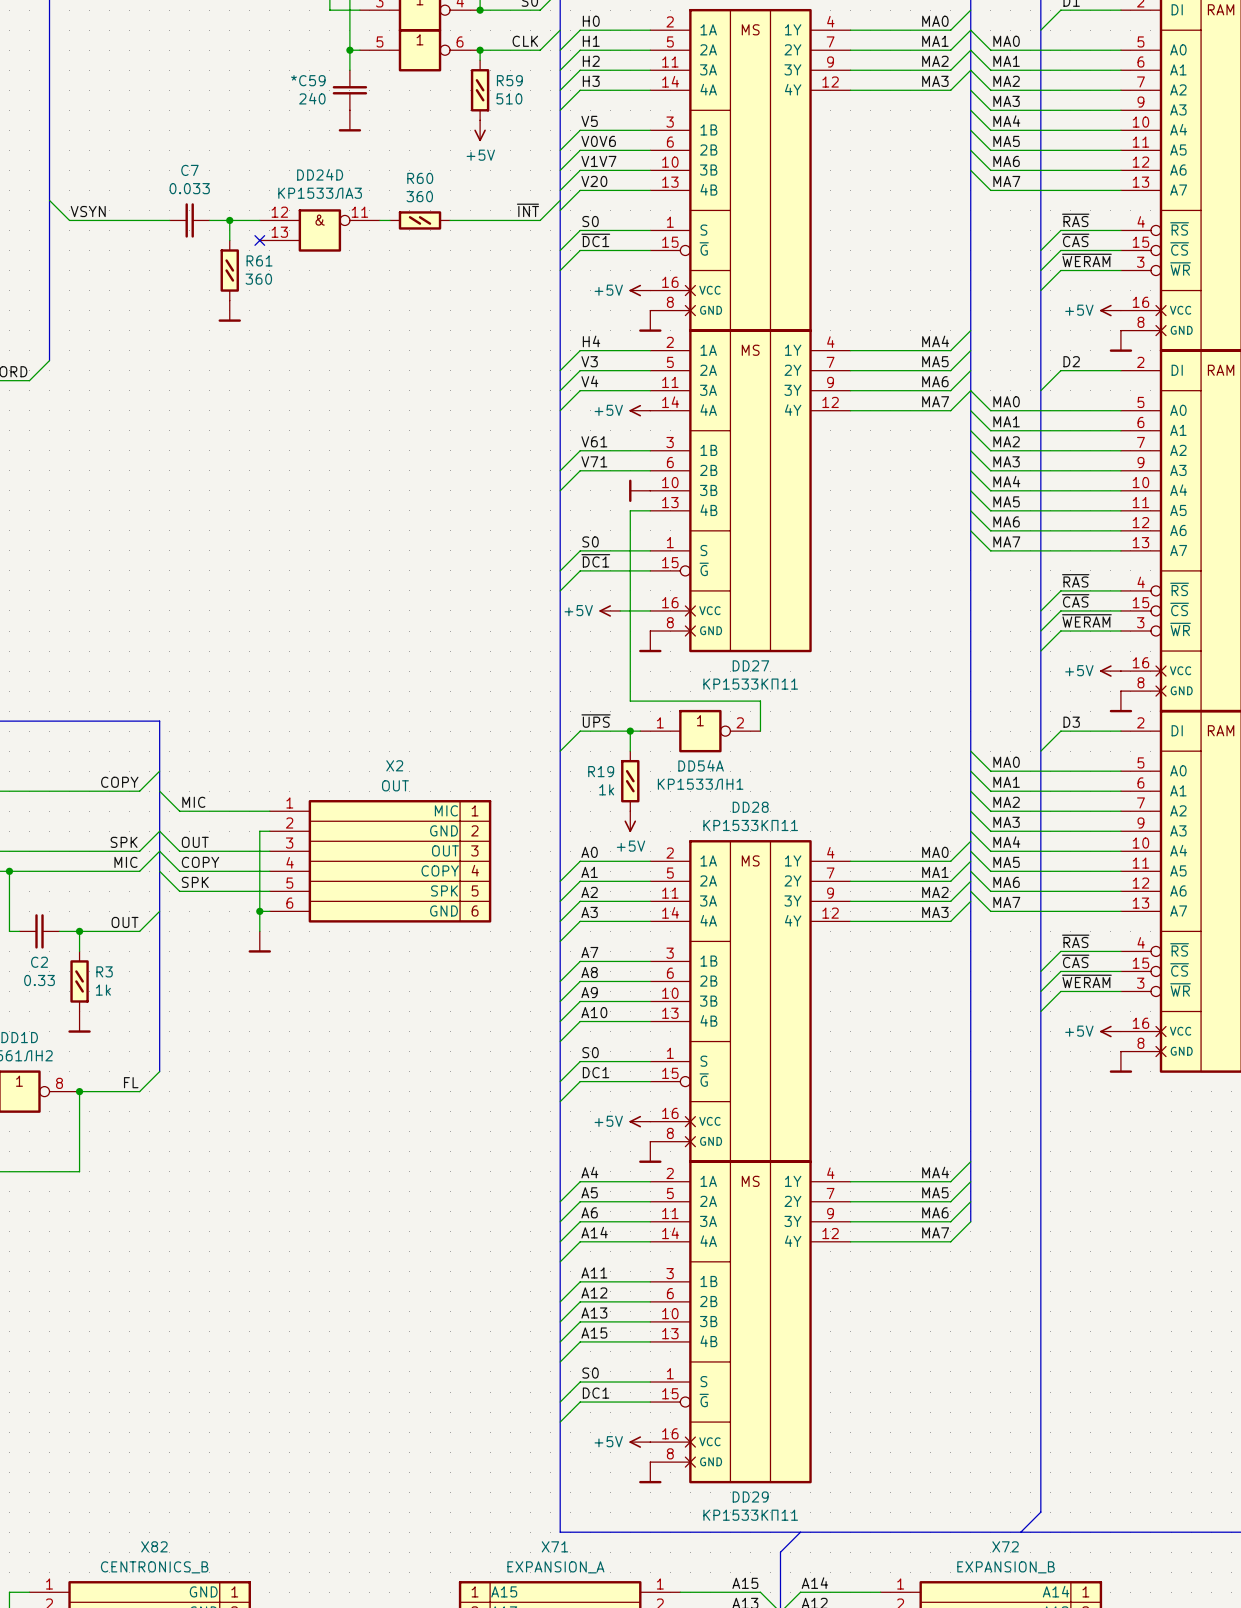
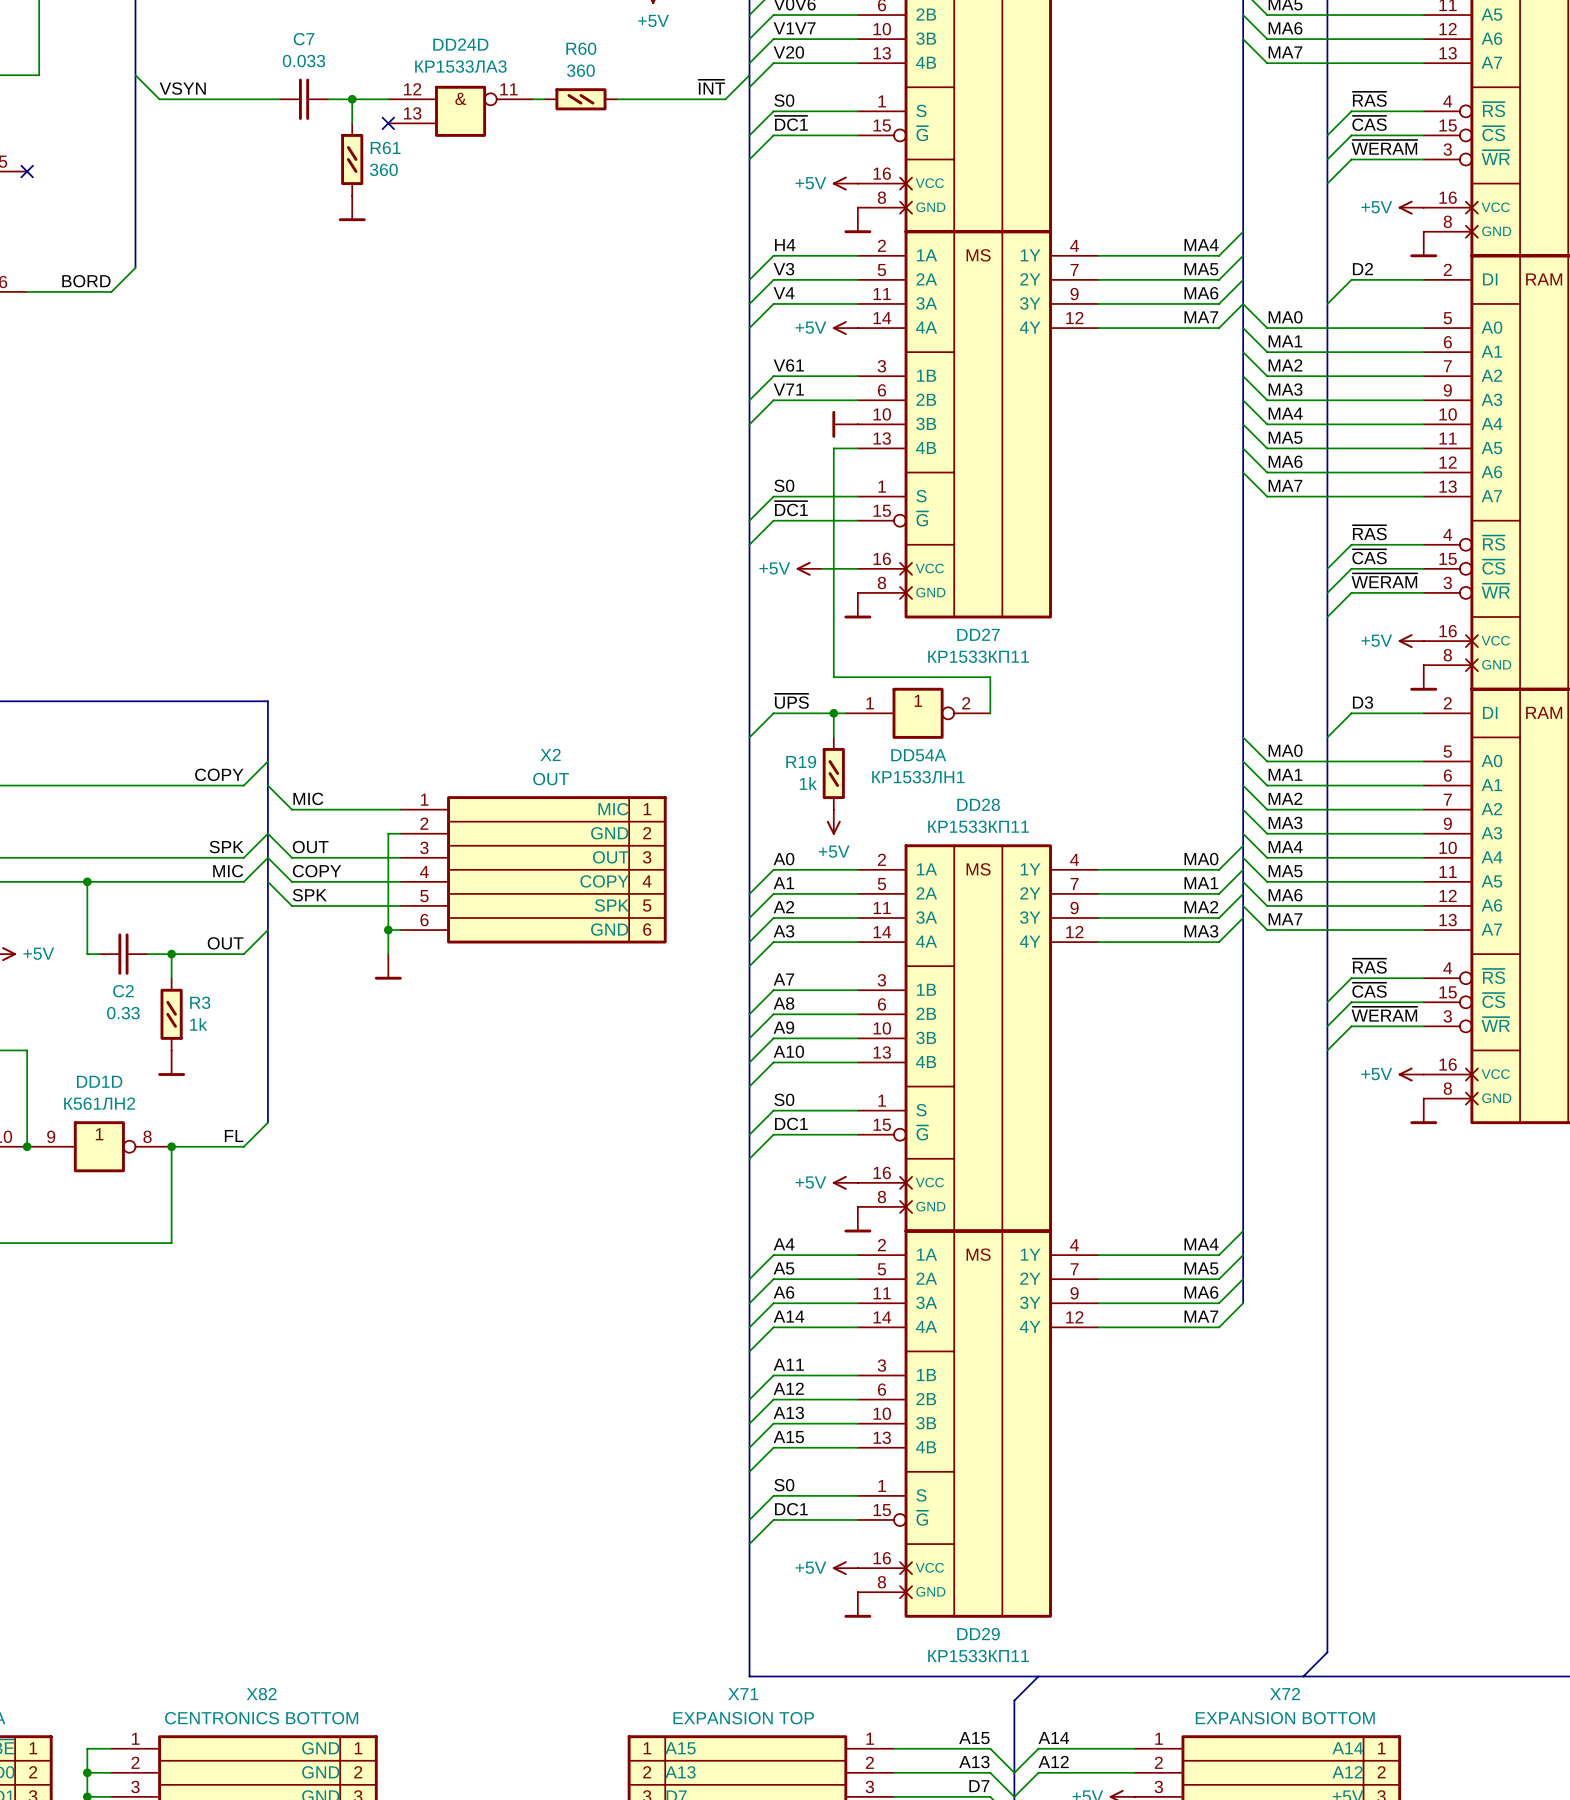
X82 value: CENTRONICS_B (154, 1567) -> CENTRONICS BOTTOM (261, 1718)
X71 value: EXPANSION_A (555, 1567) -> EXPANSION TOP (743, 1718)
X72 value: EXPANSION_B (1006, 1567) -> EXPANSION BOTTOM (1285, 1718)

